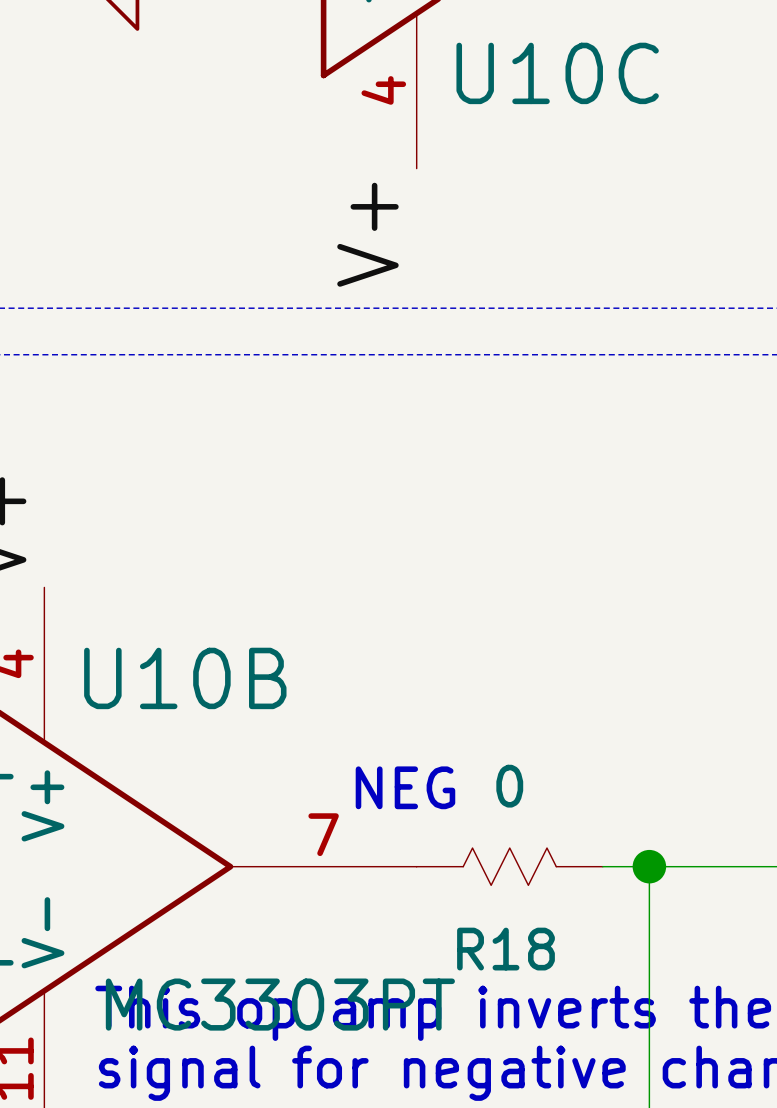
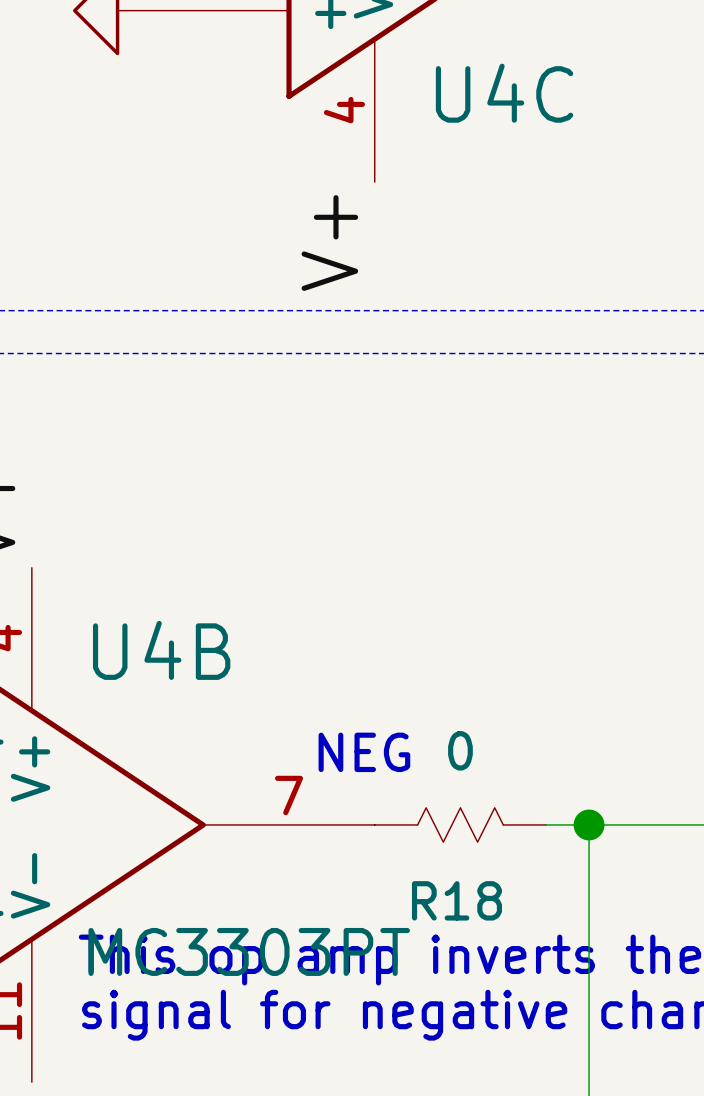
U10C name: U10C (557, 73) -> U4C (504, 93)
U10B name: U10B (185, 678) -> U4B (161, 650)

